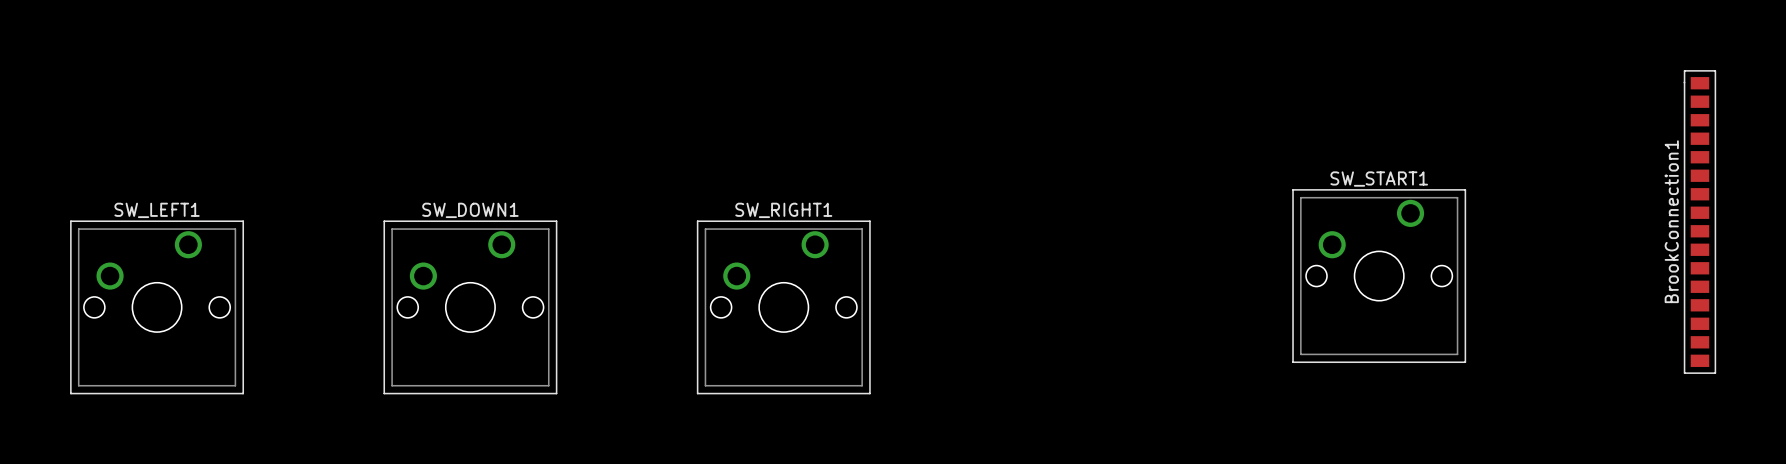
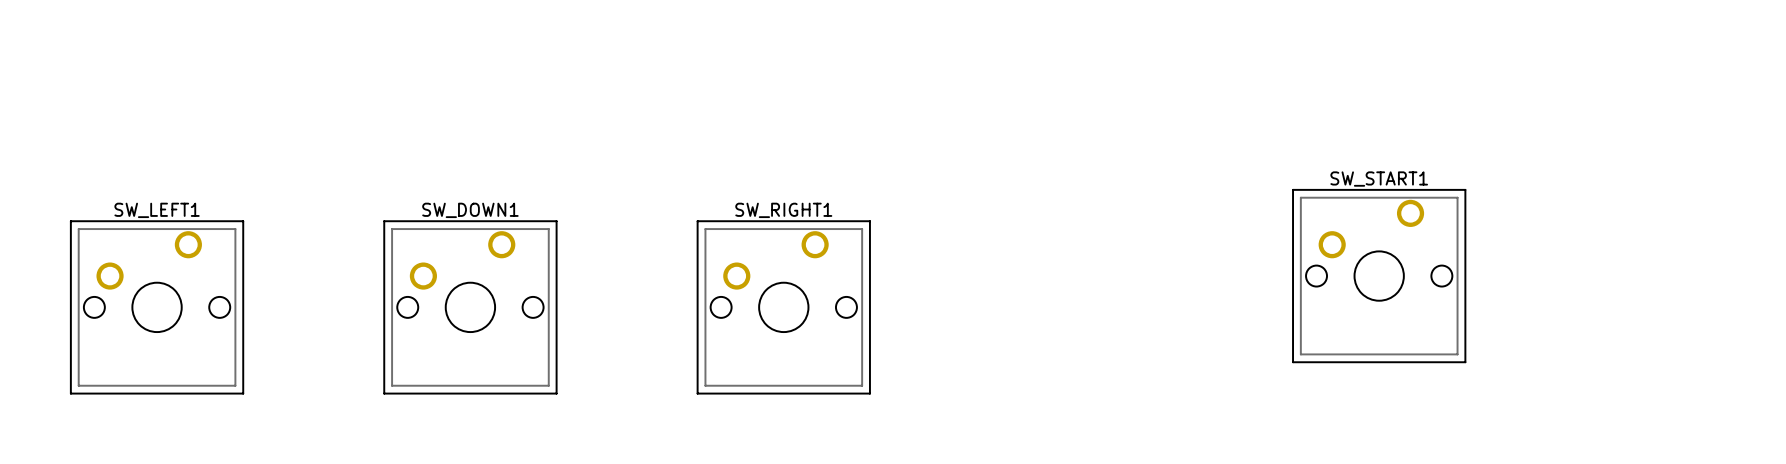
BrookConnection1: (1699, 222) -> none

